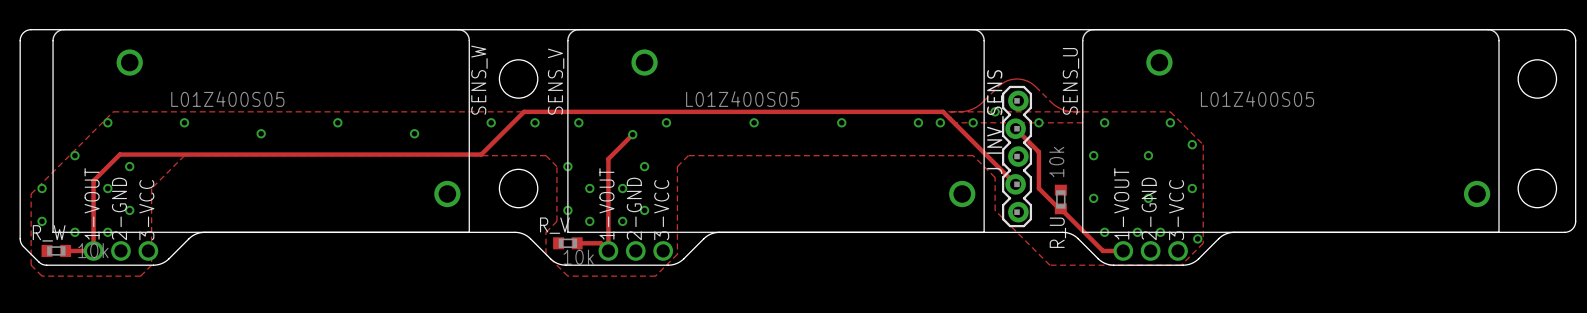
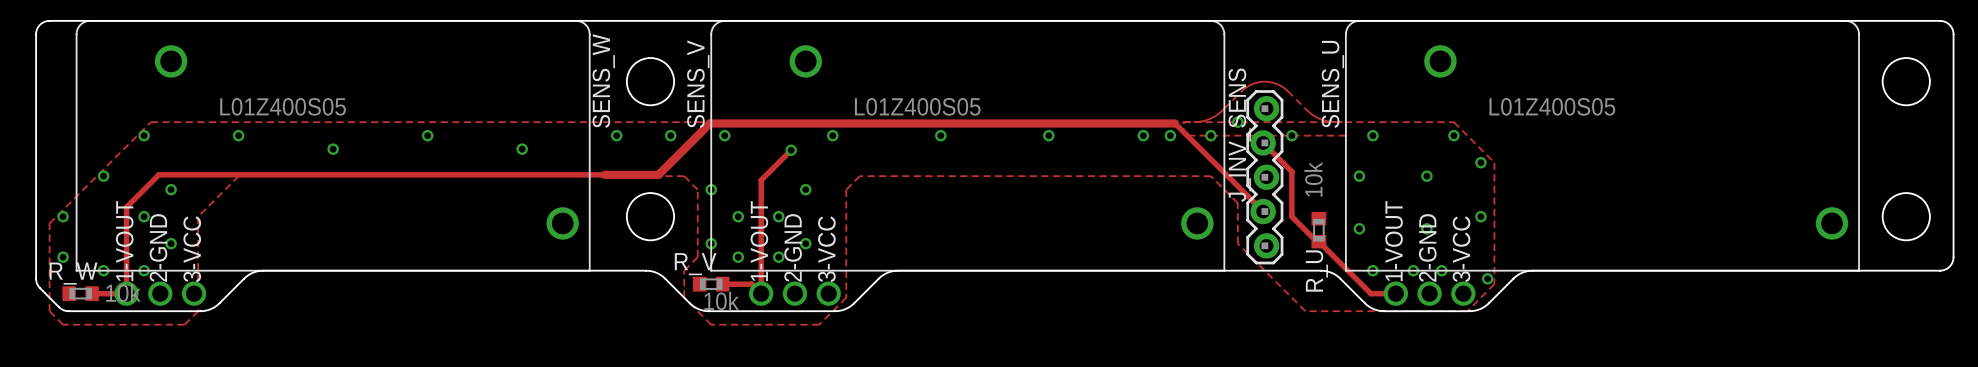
track: (944, 112) (524, 111) (481, 154) -> (1175, 123) (709, 123) (658, 174) (604, 174)

